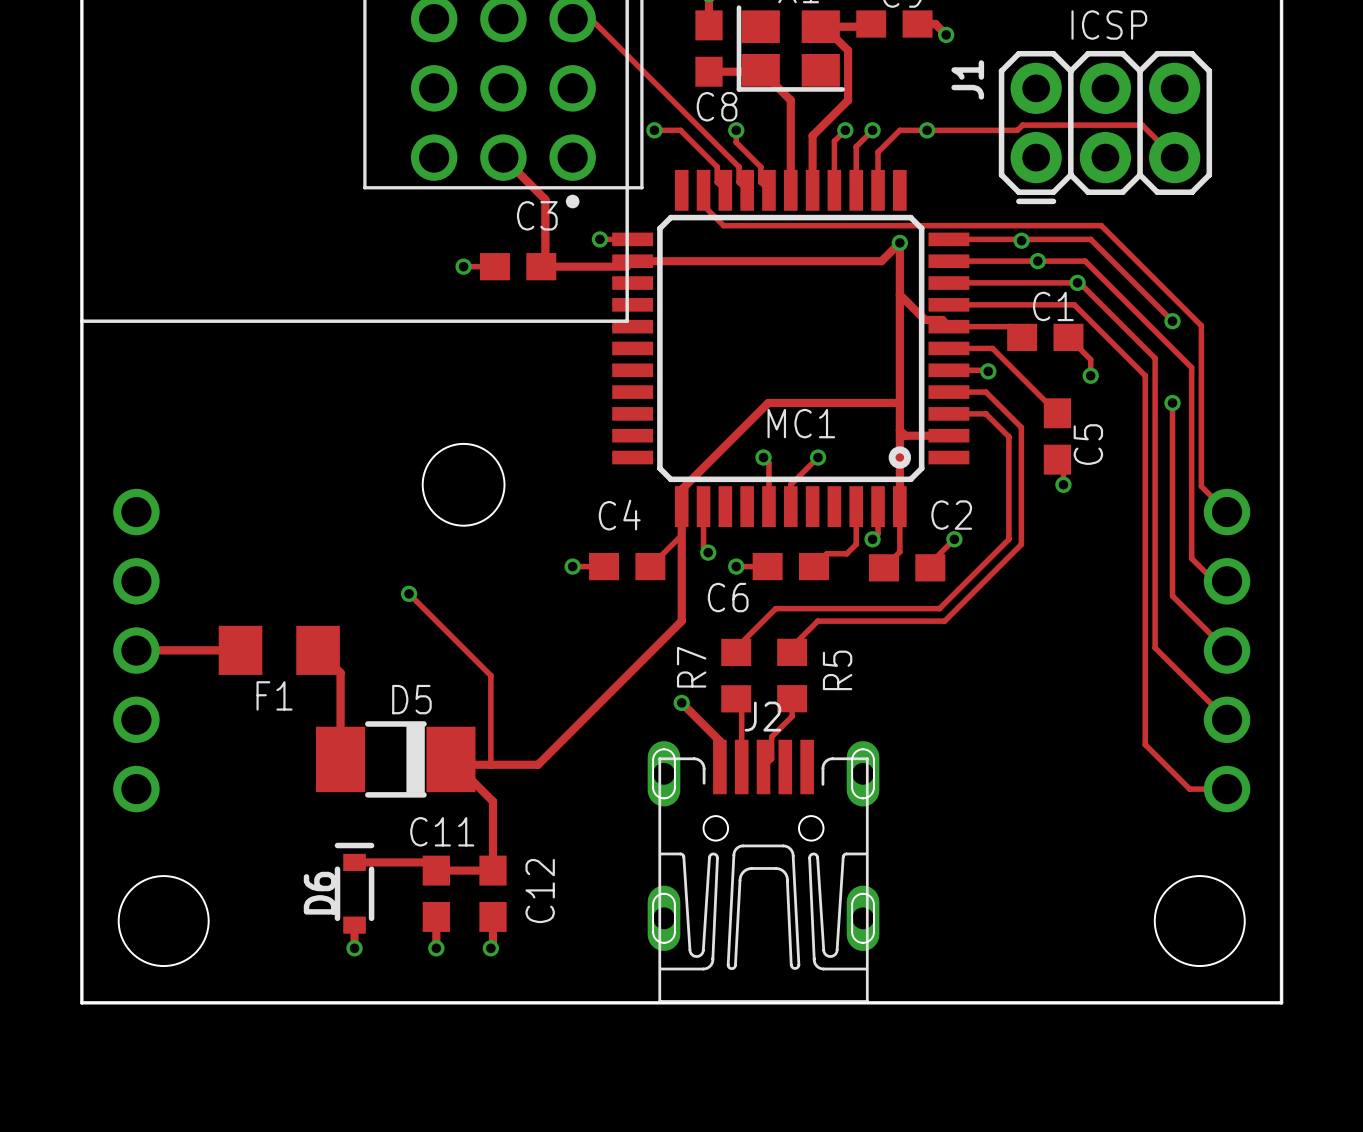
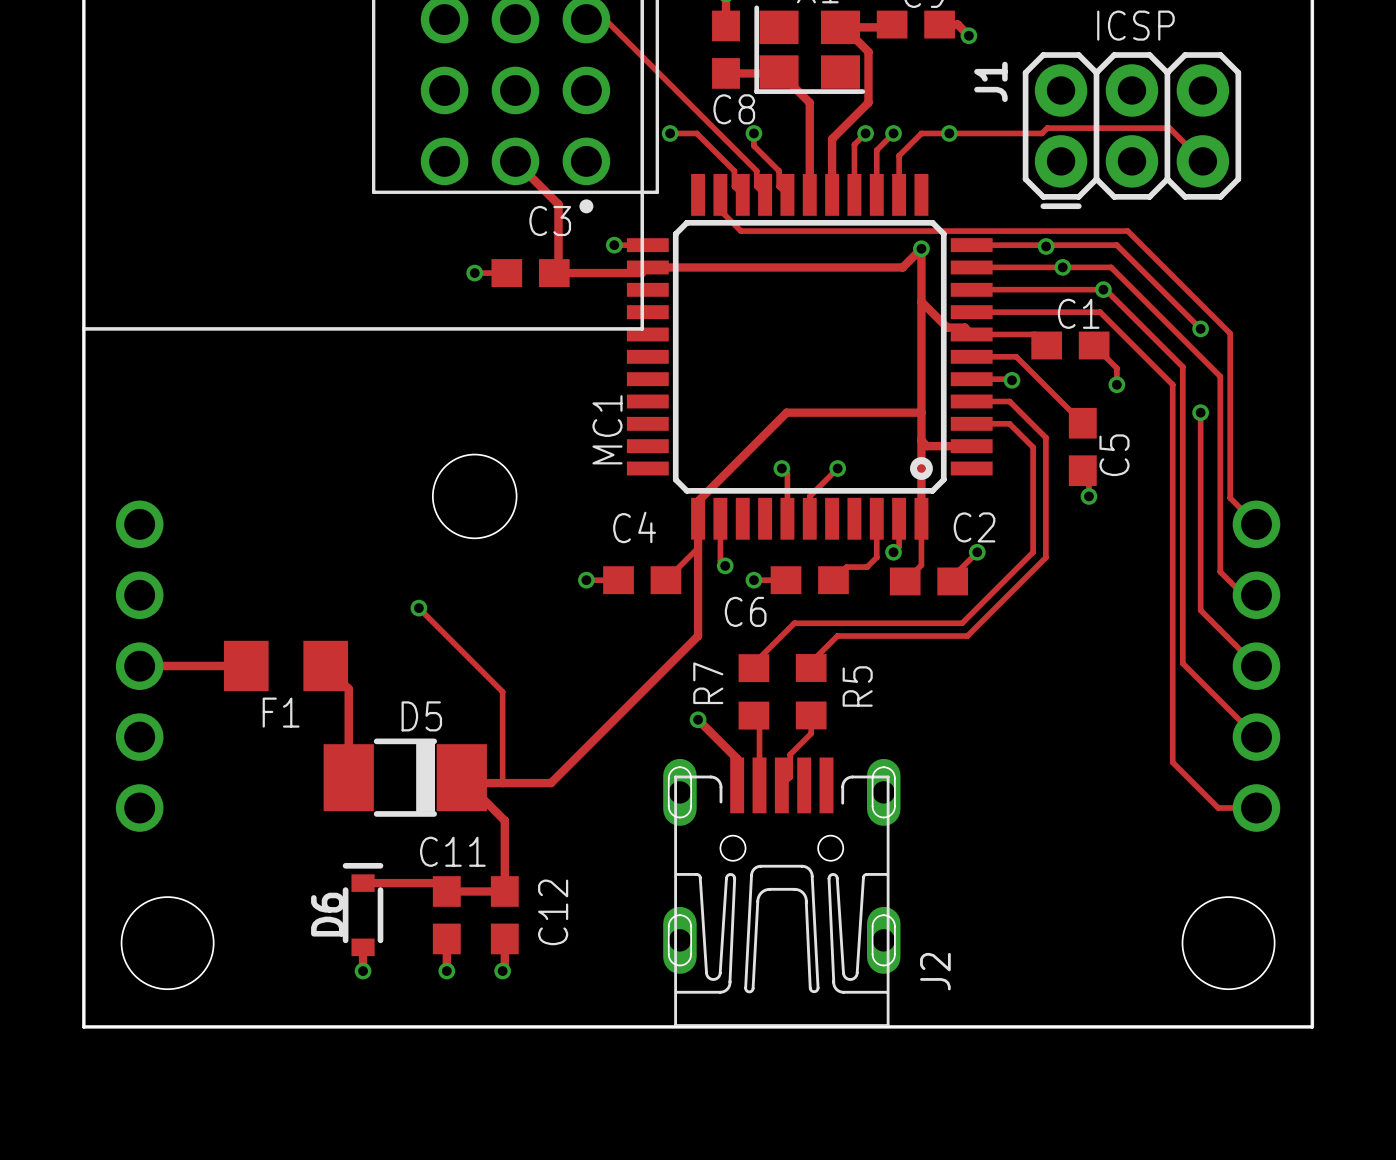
MC1 name rotation: 0° (801, 423) -> 90° counterclockwise (607, 429)
MC1 name position: MC1 (801, 423) -> MC1 (607, 429)
J2 name rotation: 0° (762, 716) -> 90° counterclockwise (935, 971)
J2 name position: J2 (762, 716) -> J2 (935, 971)

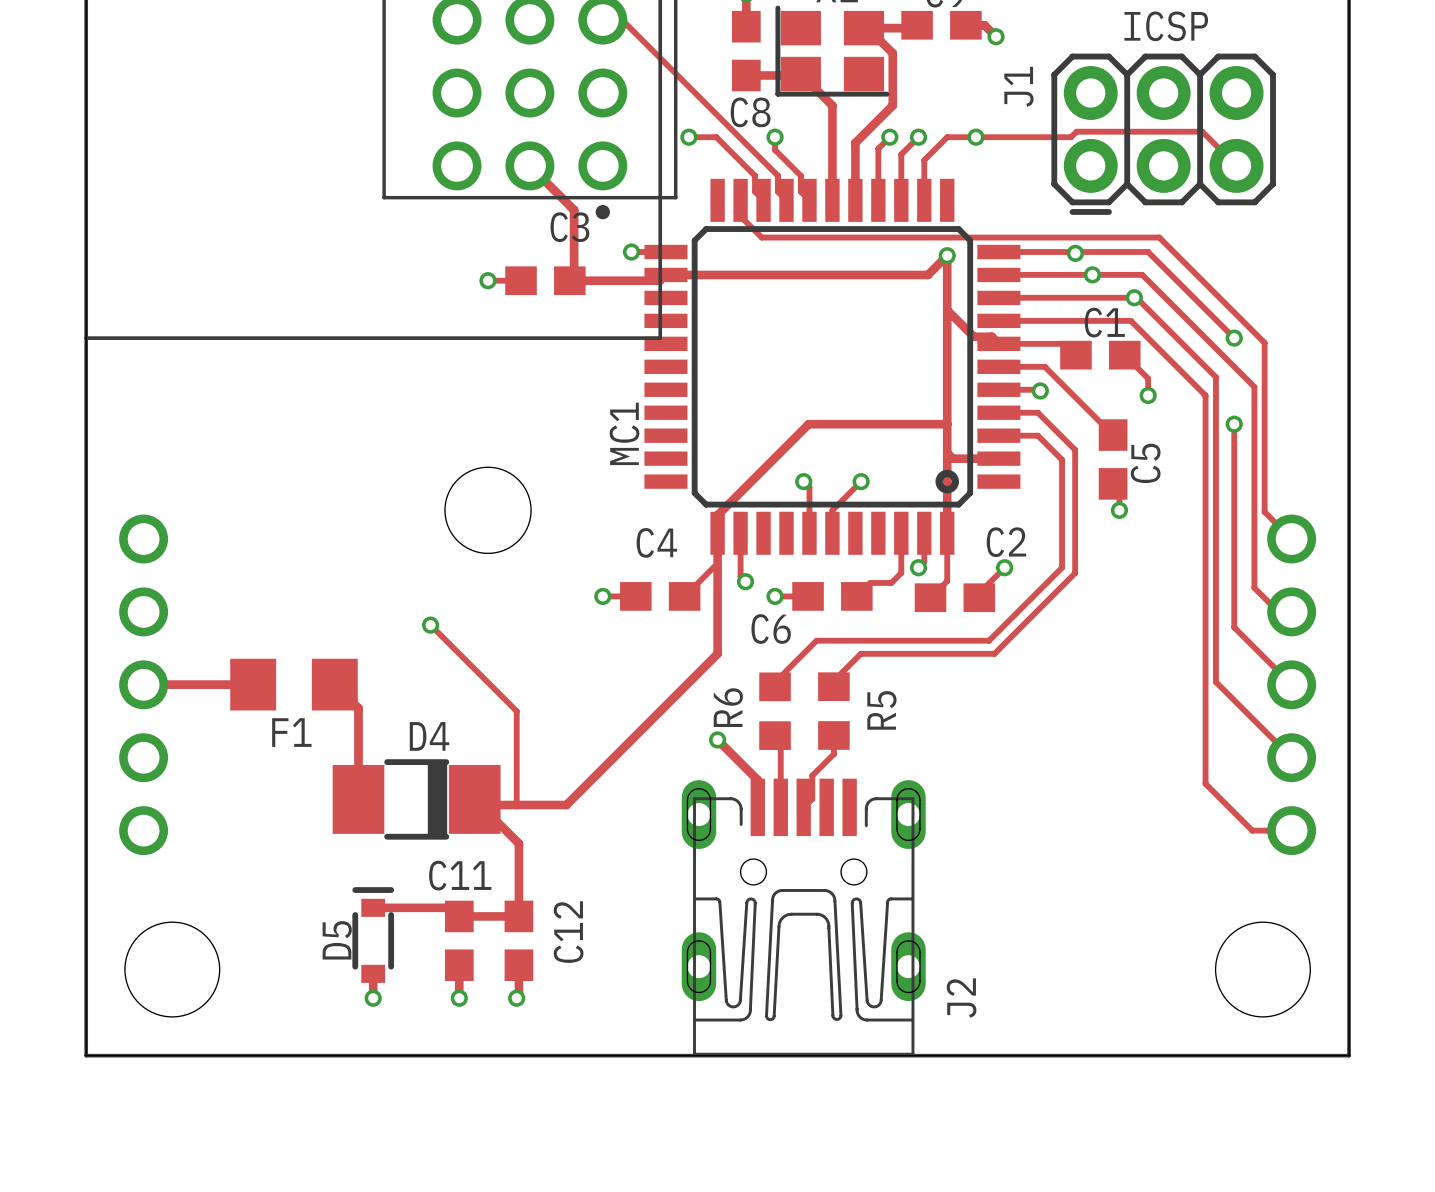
R7 name: R7 (708, 683) -> R6 (728, 707)
D5 name: D5 (421, 716) -> D4 (429, 736)
D6 name: D6 (327, 914) -> D5 (337, 940)

